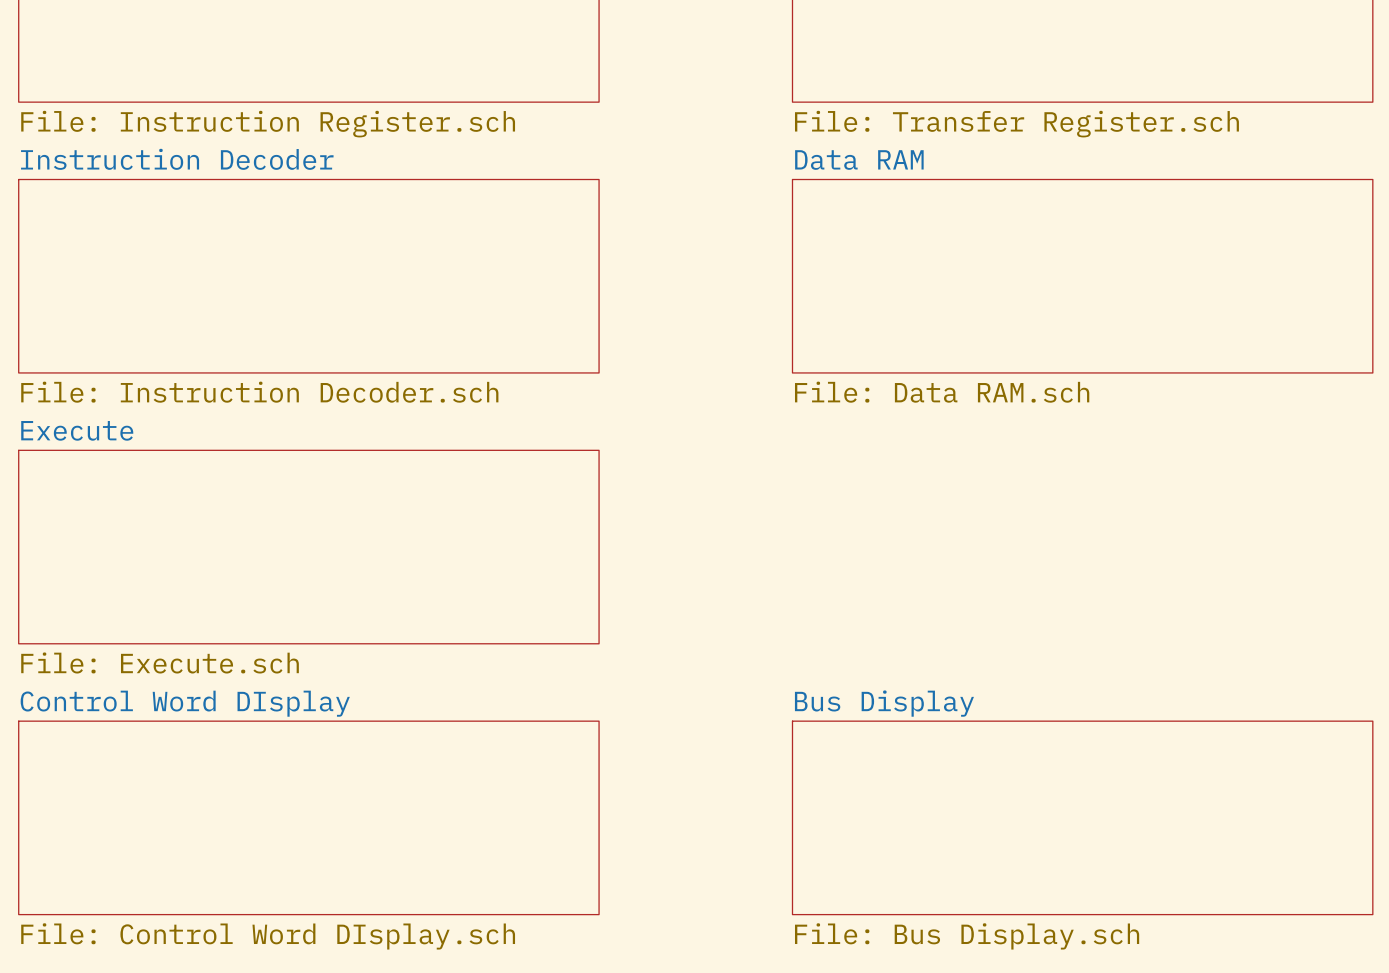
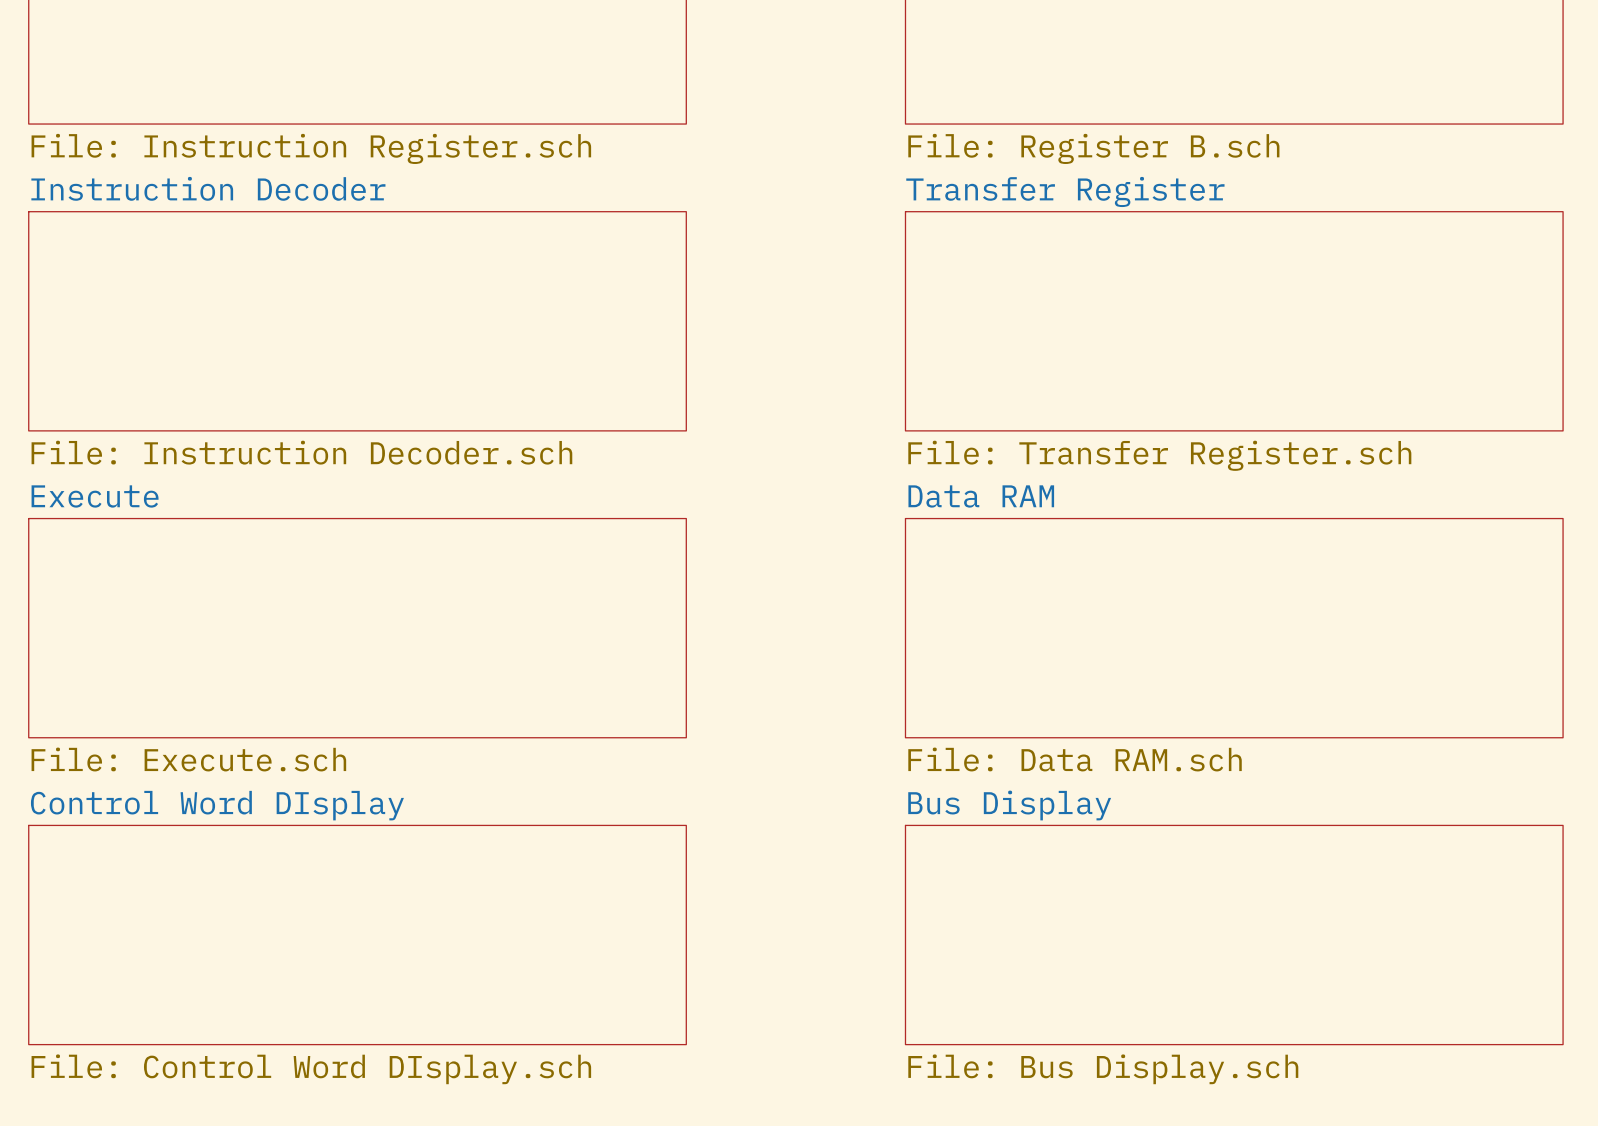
sheet value: File: Transfer Register.sch (1016, 124) -> File: Register B.sch (1093, 148)
sheet Data RAM name: Data RAM (859, 160) -> Transfer Register (1065, 191)
sheet Data RAM value: File: Data RAM.sch (942, 392) -> File: Transfer Register.sch (1159, 455)
sheet Data RAM: none -> File: Data RAM.sch (1234, 628)

